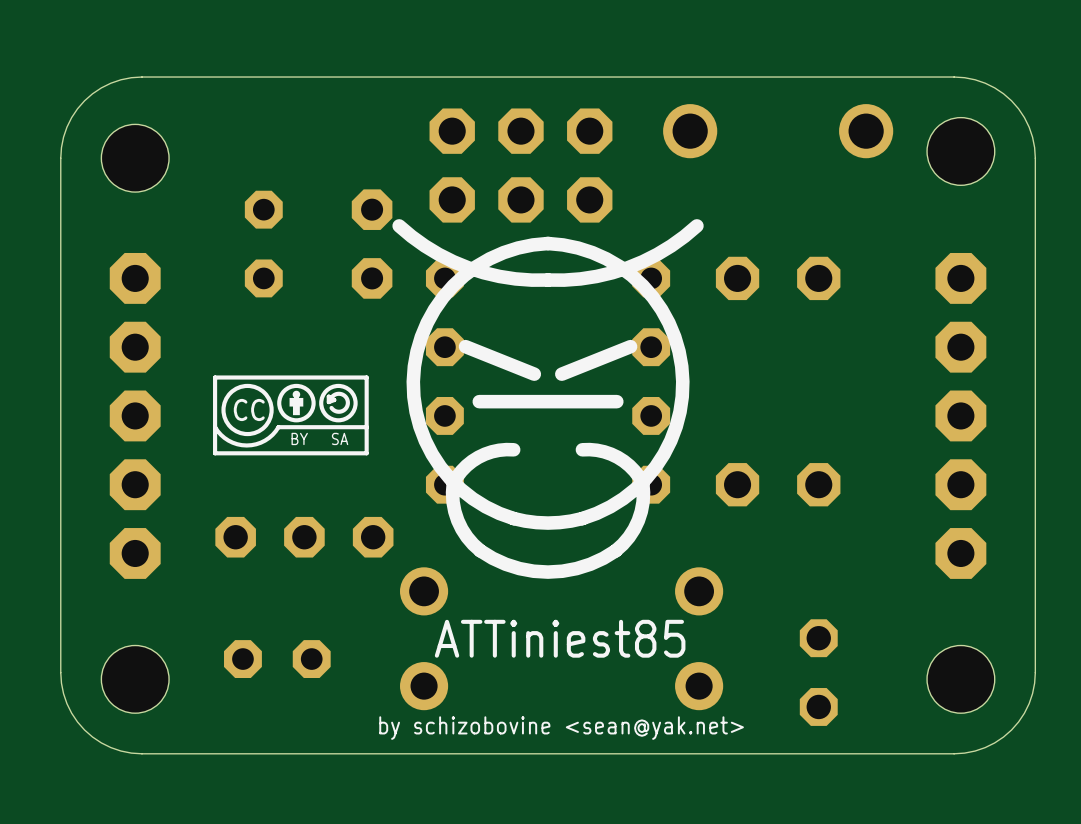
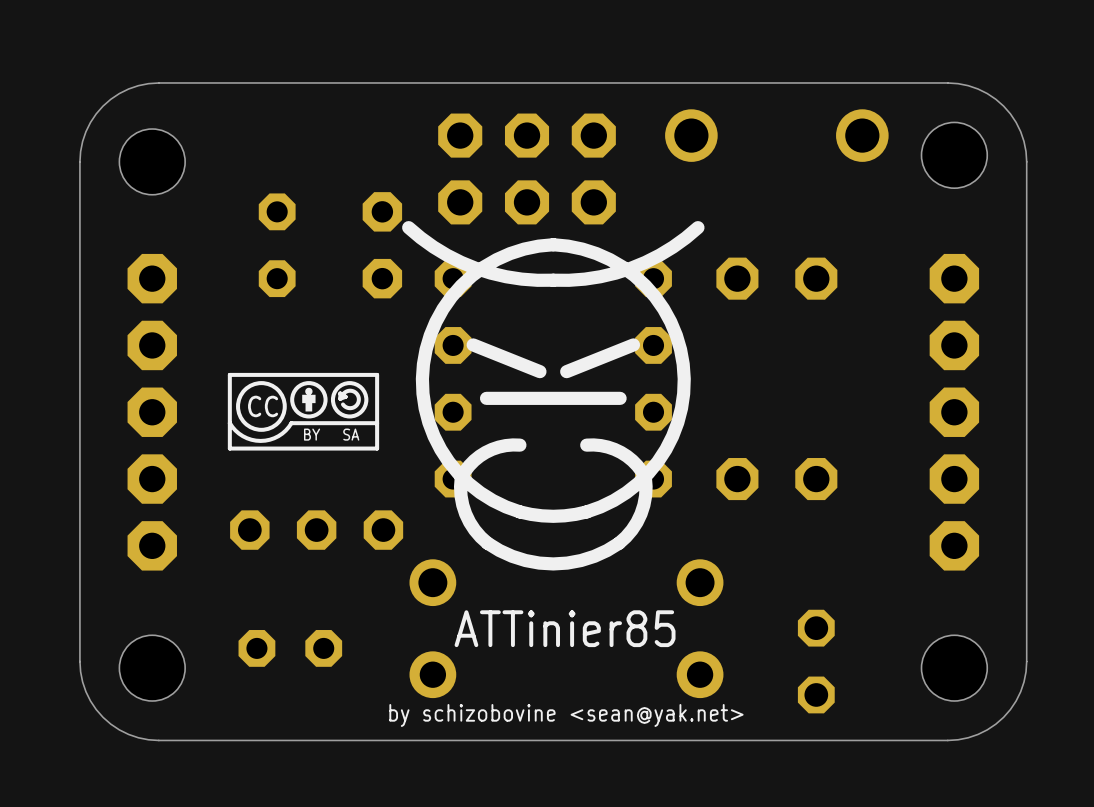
text: ATTiniest85 (560, 638) -> ATTinier85 (565, 628)

